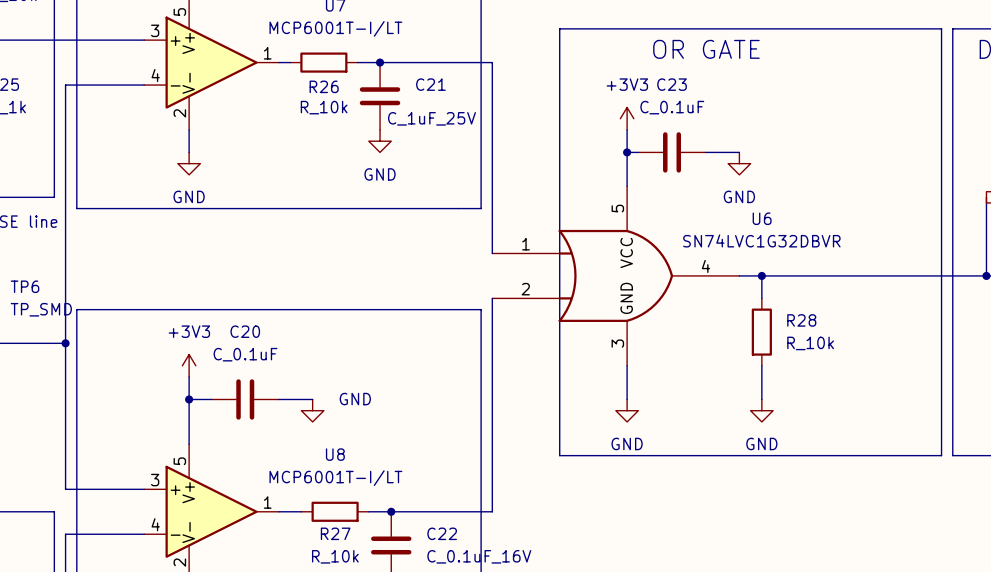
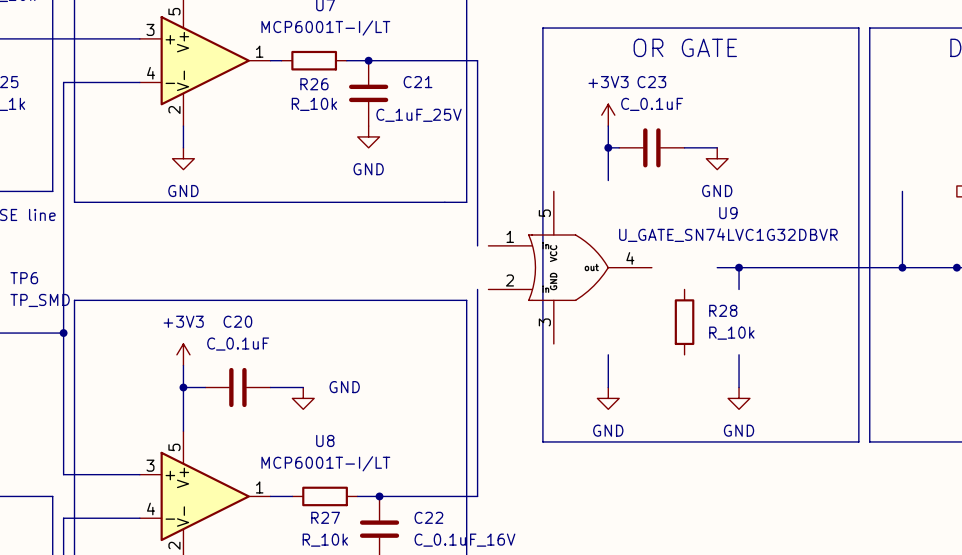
line: (885, 28) (896, 28) -> (858, 28) (858, 441)
line: (941, 28) (941, 455) -> (913, 28) (924, 28)
line: (952, 28) (952, 455) -> (913, 441) (924, 441)
wire: (986, 197) (986, 275) -> (902, 191) (902, 267)
U9: none -> U_GATE_SN74LVC1G32DBVR (570, 267)
U6: SN74LVC1G32DBVR (615, 275) -> none
junction: none -> (902, 267)
R28 position: (761, 332) -> (684, 322)
line: (885, 455) (896, 455) -> (869, 28) (869, 441)

